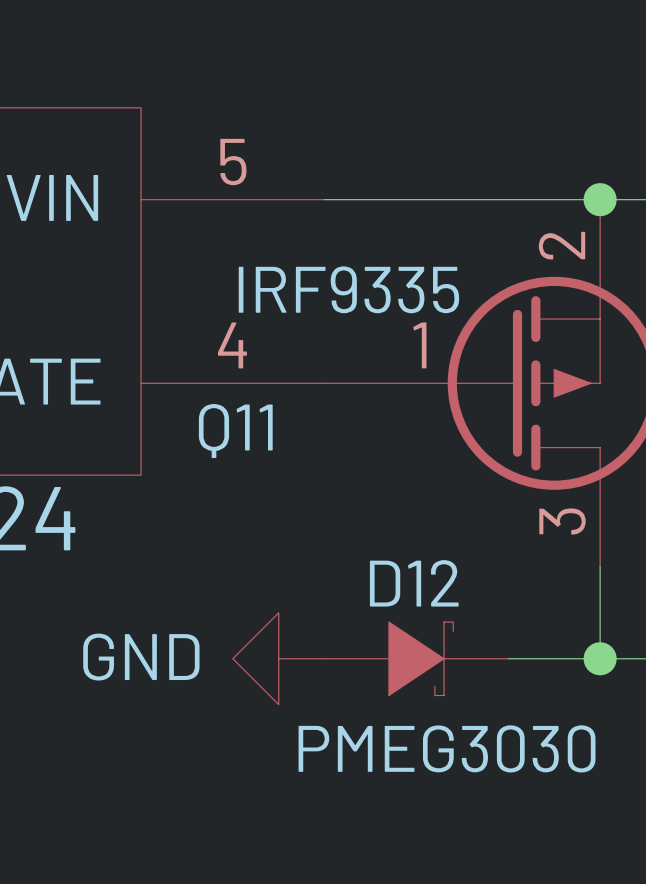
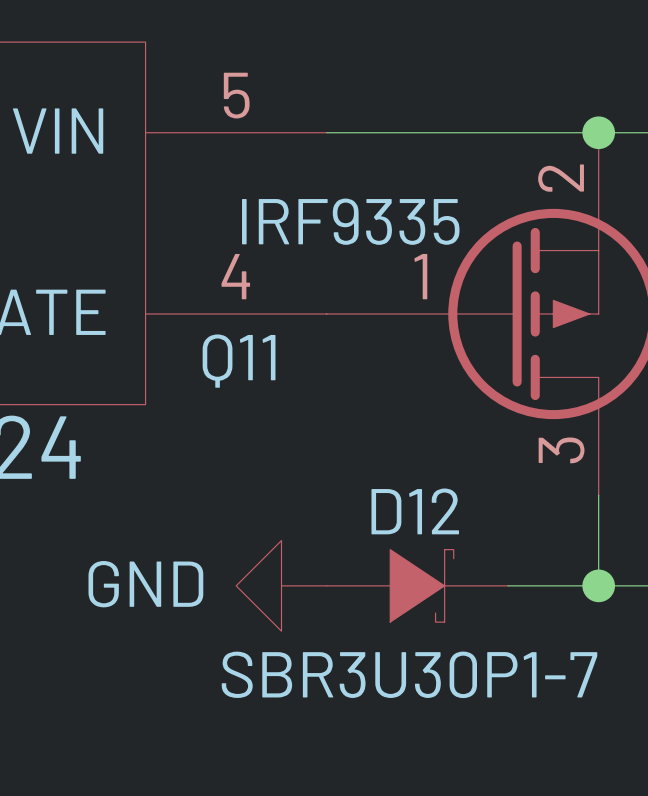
D12 value: PMEG3030 (447, 748) -> SBR3U30P1-7 (409, 674)

